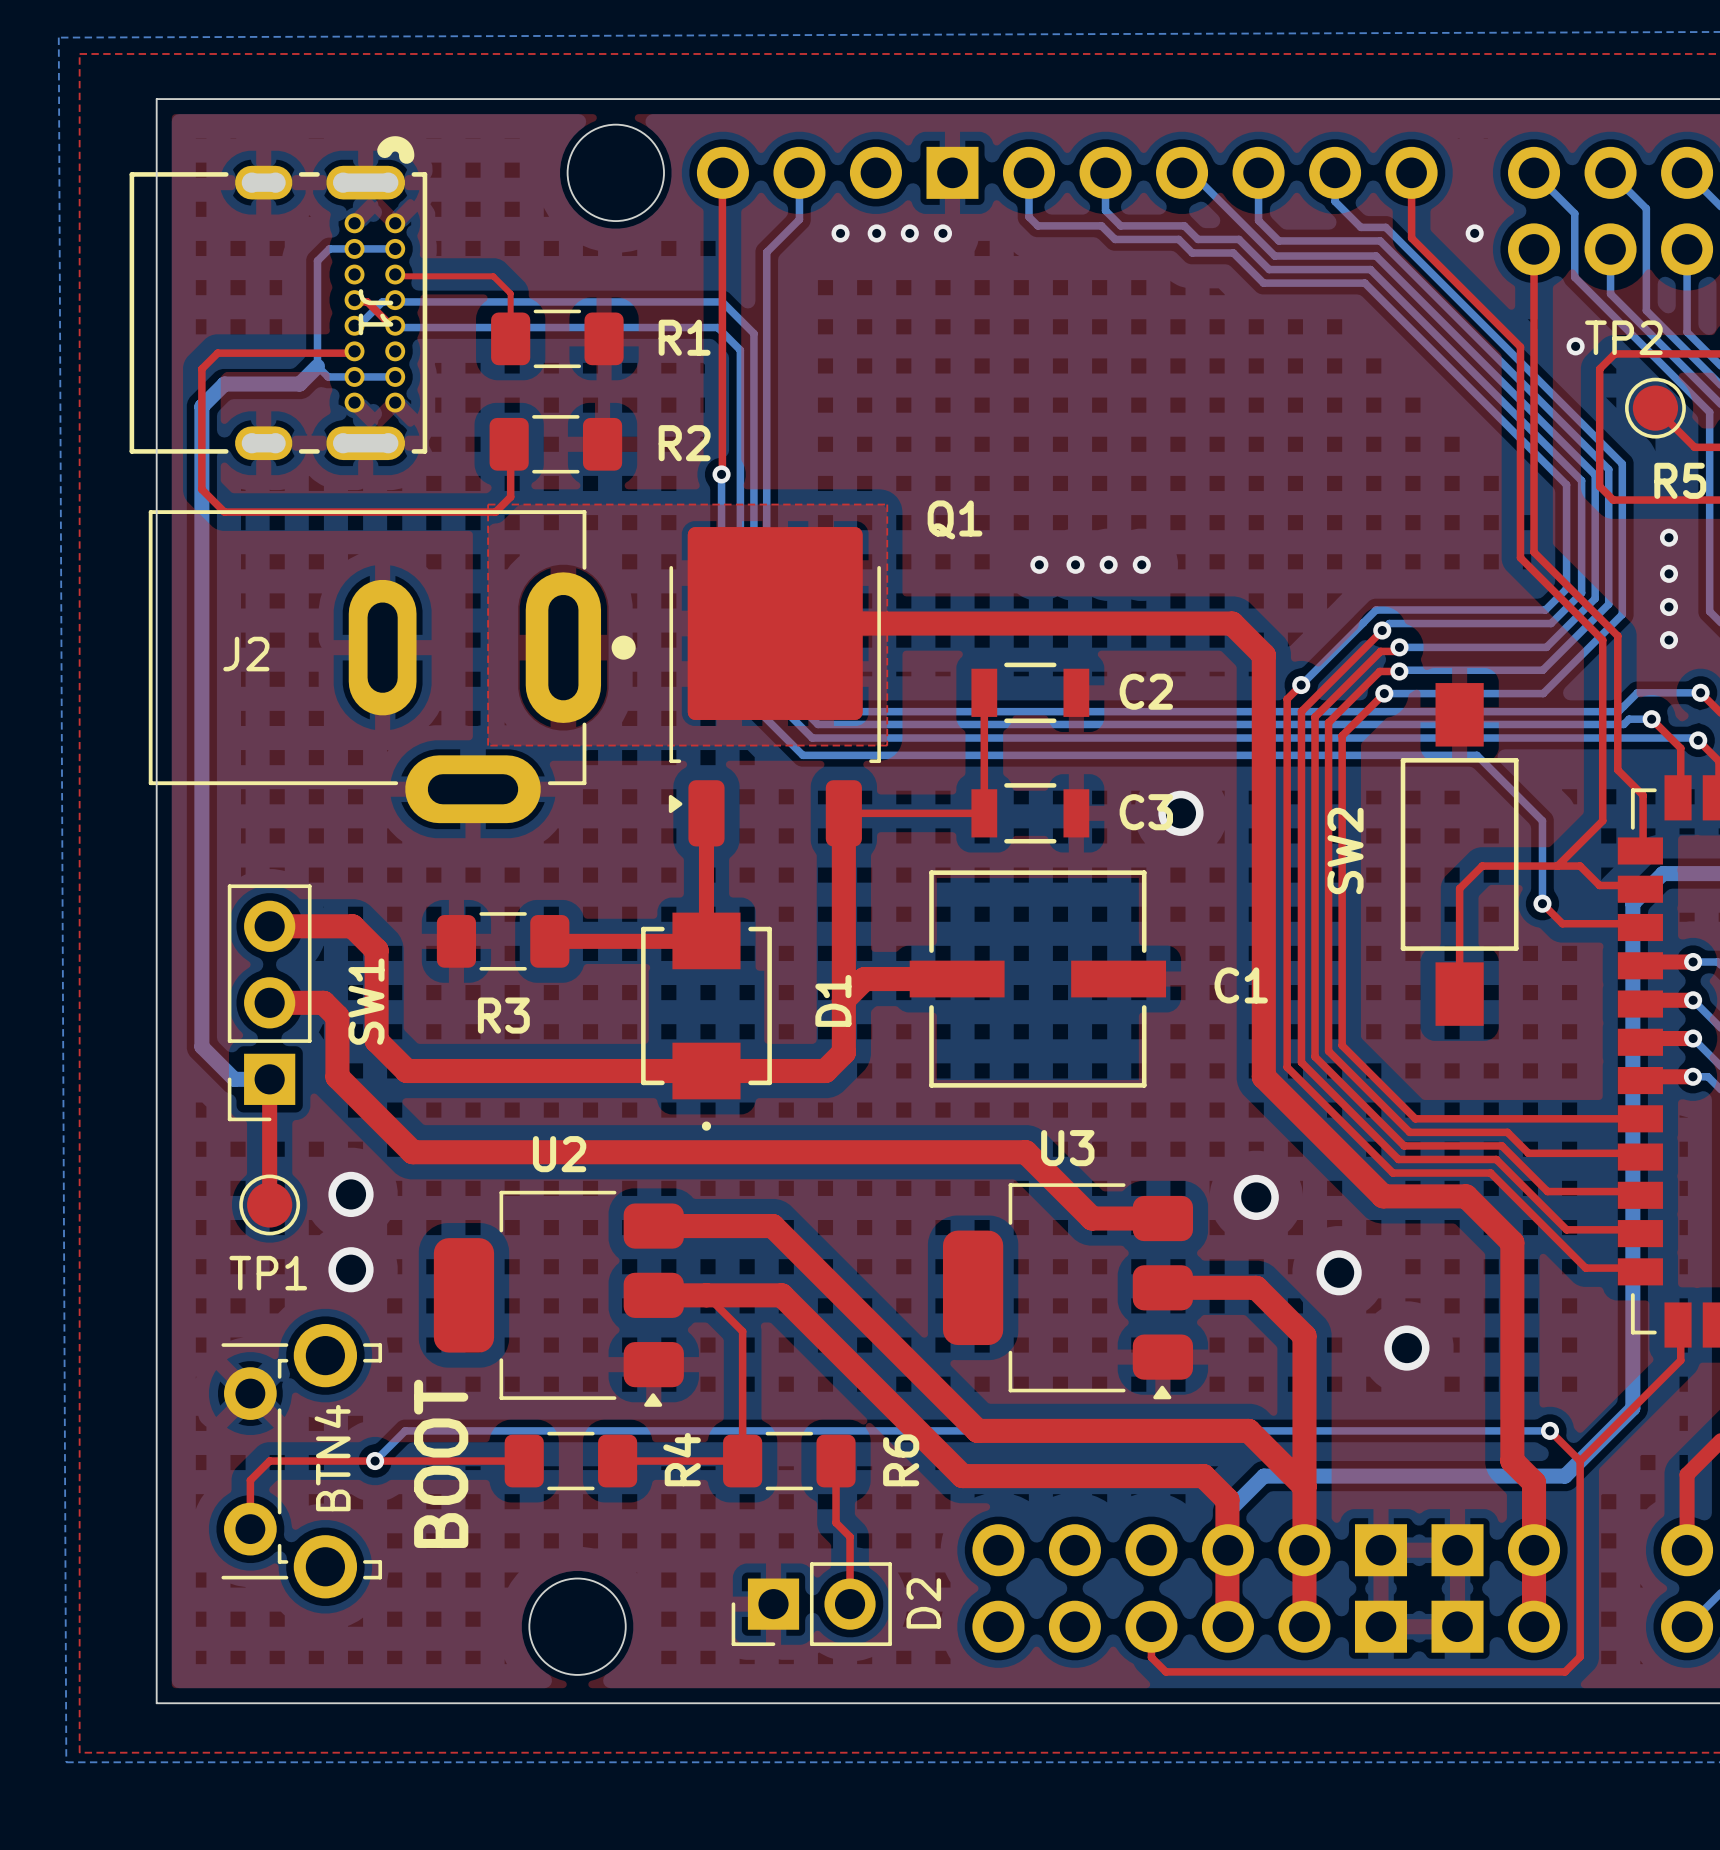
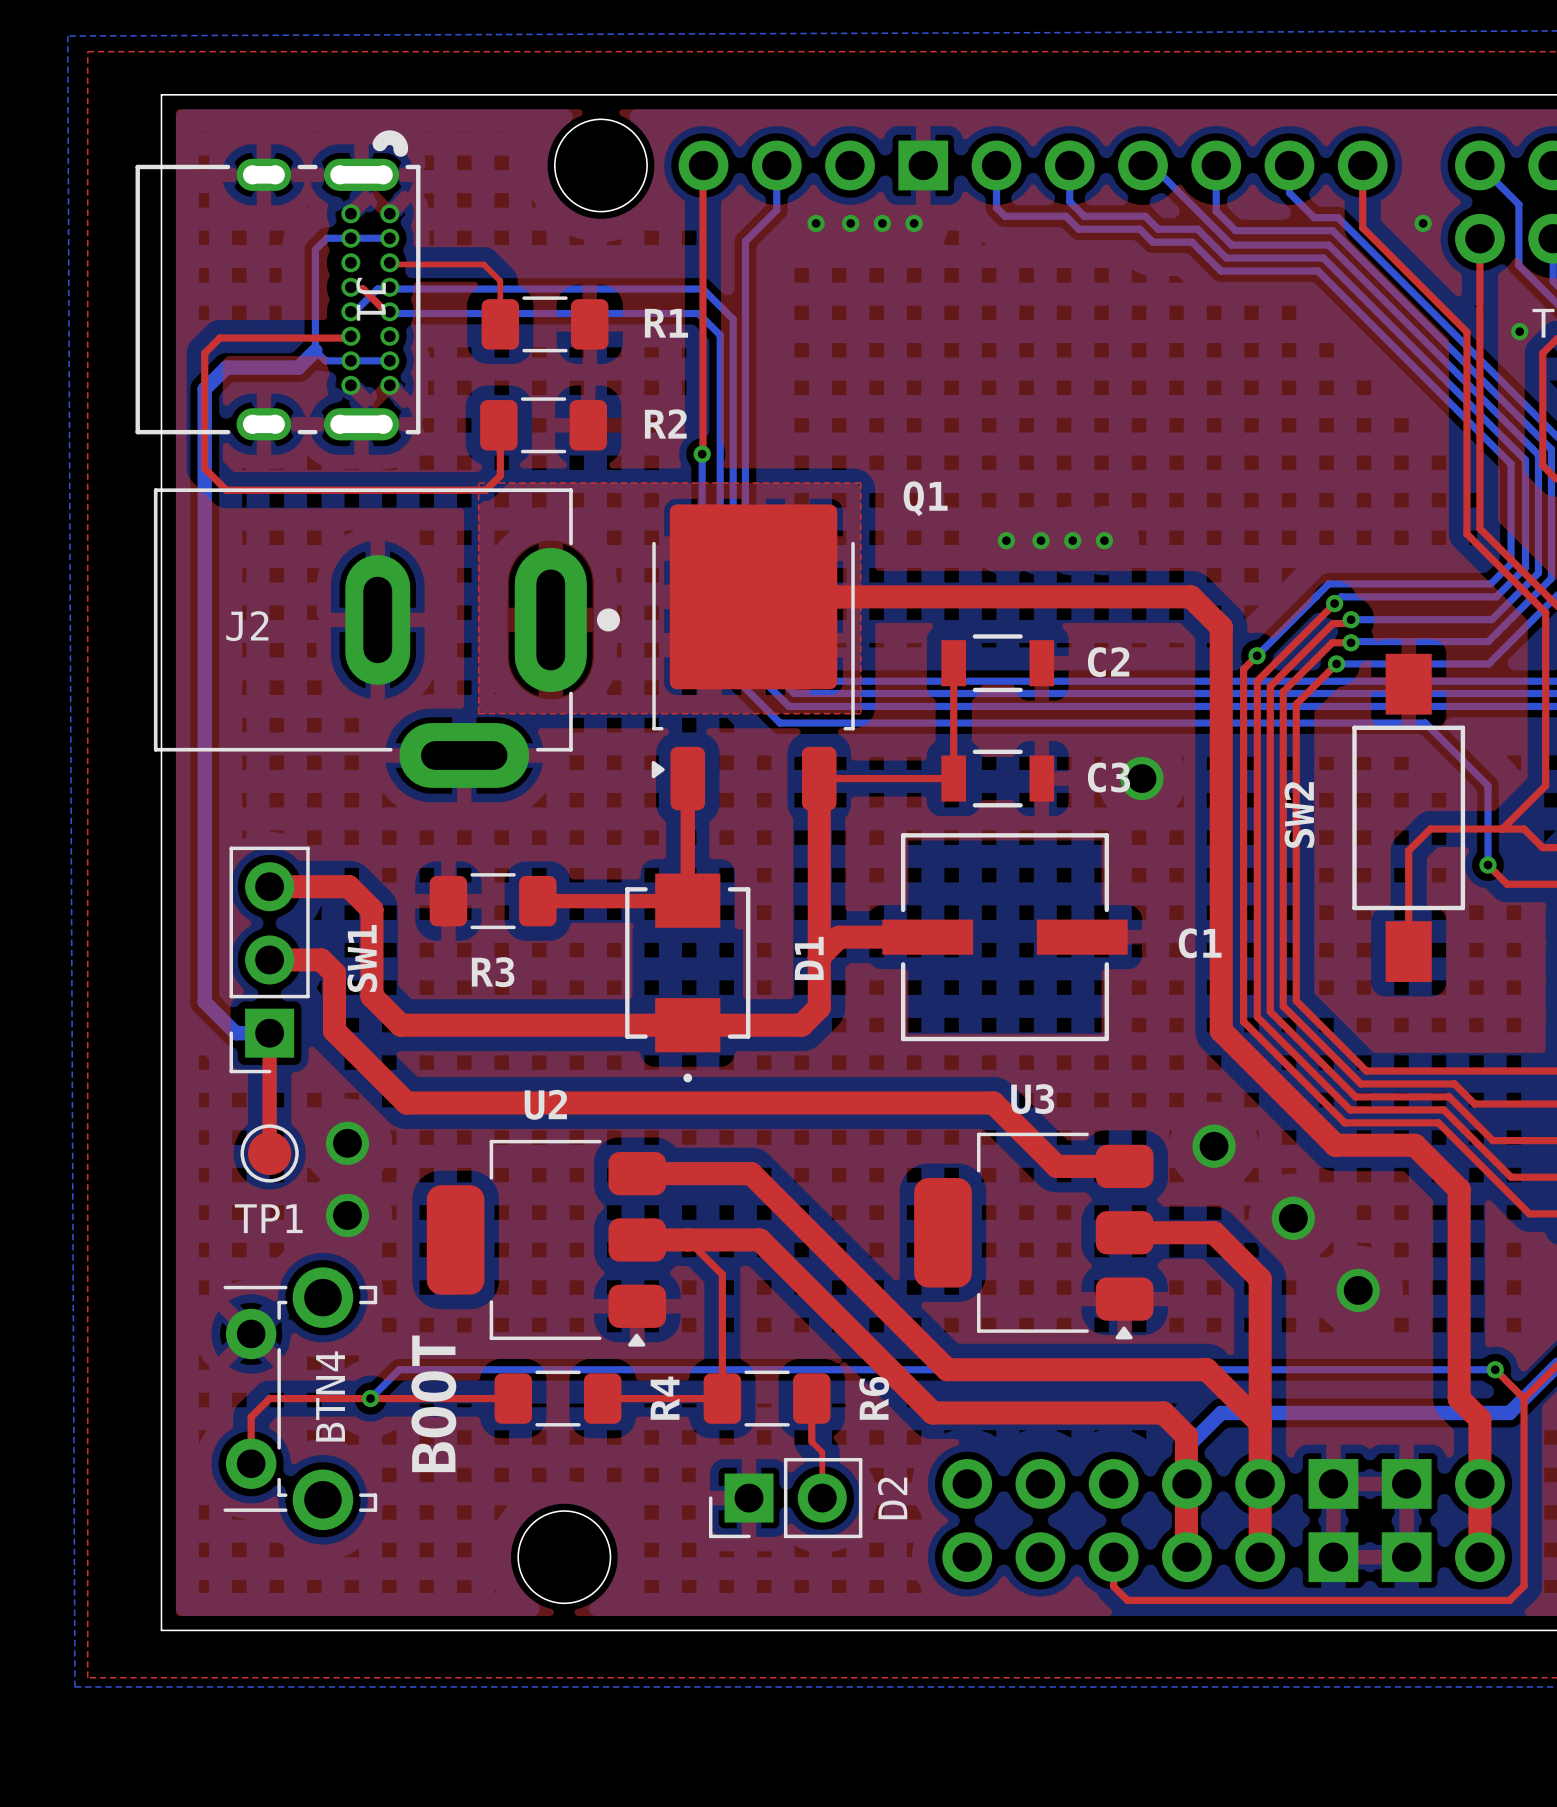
top track: (836, 1506) (836, 1522) (850, 1536) (850, 1604) -> (811, 1441) (822, 1452) (822, 1498)
D2 position: (811, 1604) -> (785, 1498)

